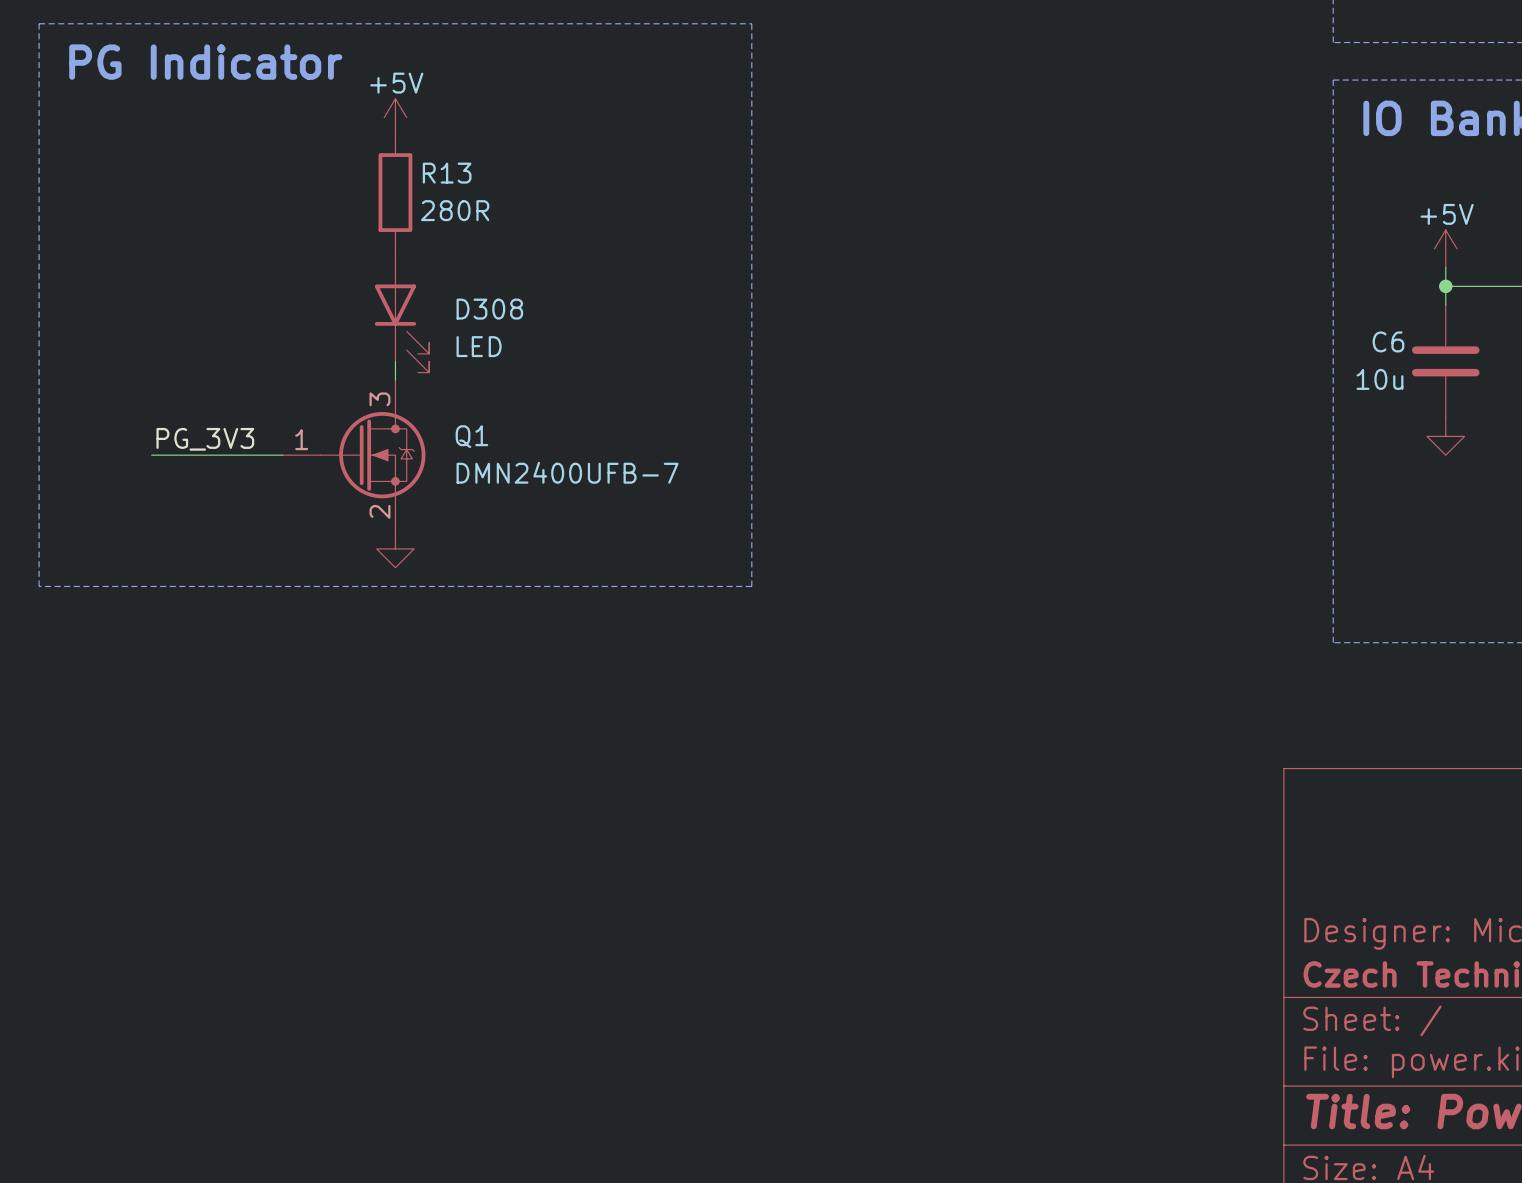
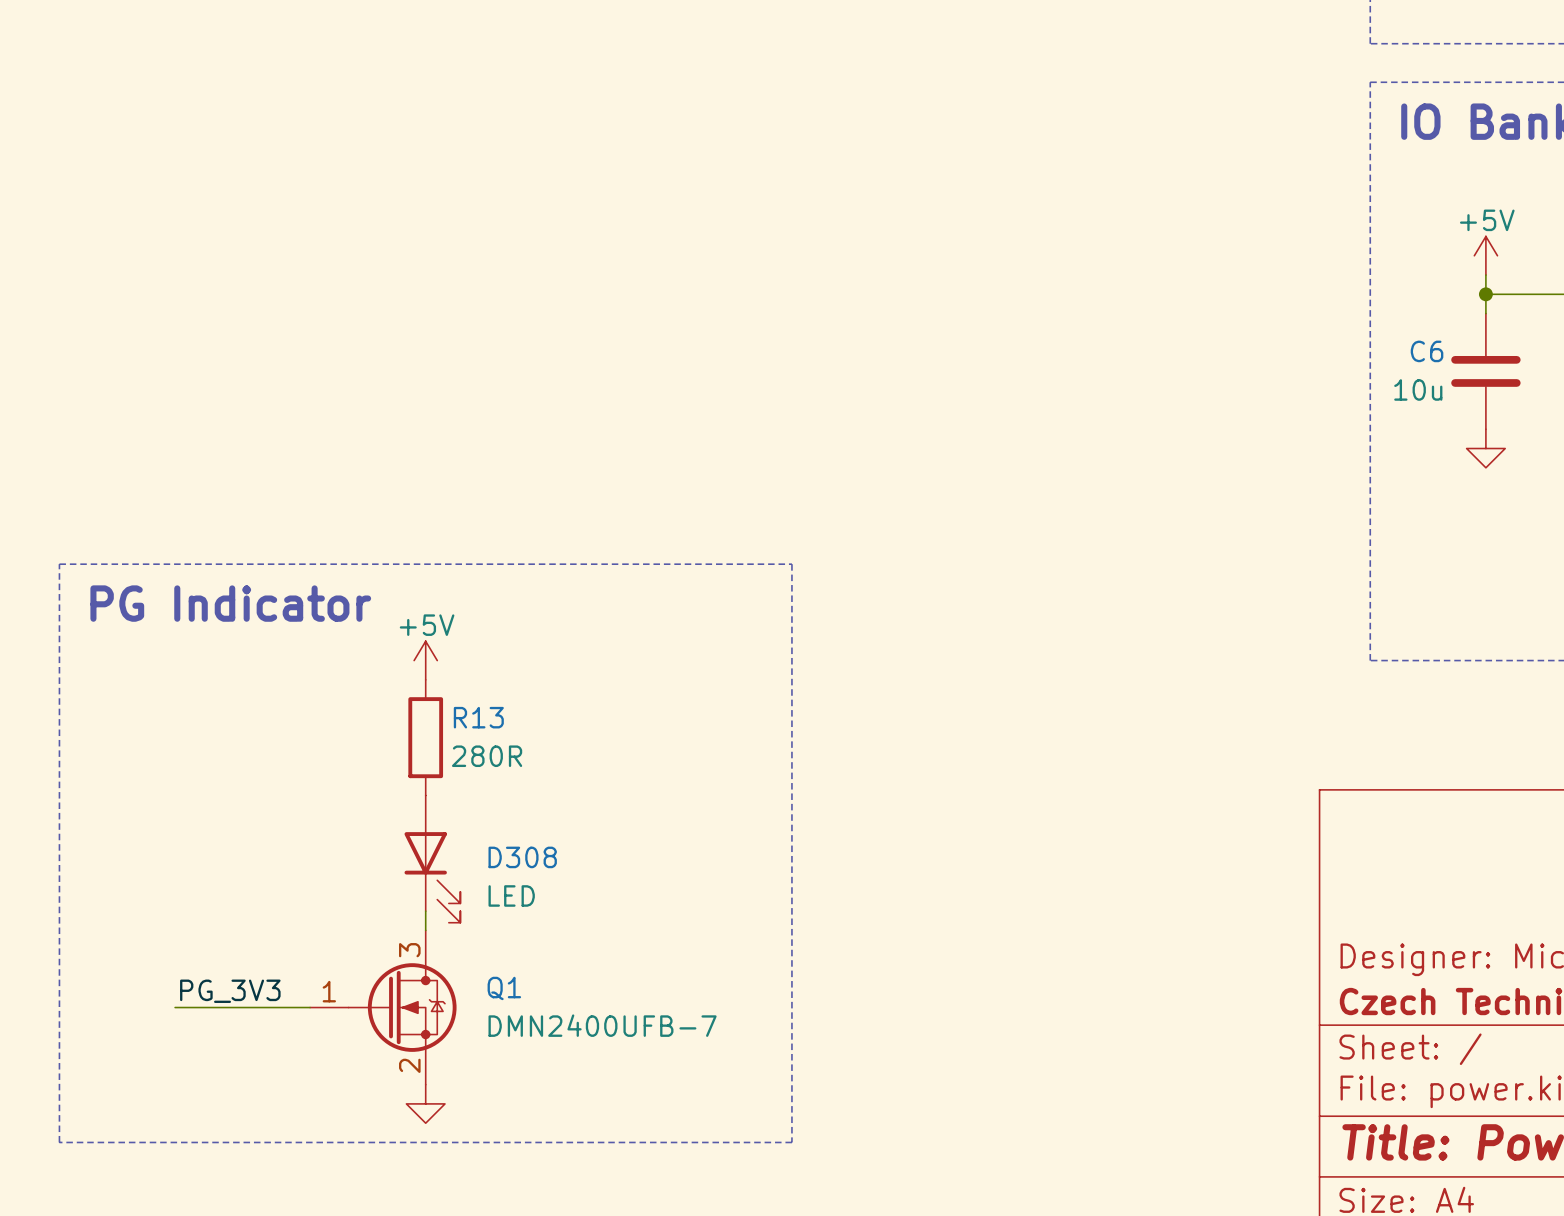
line: (39, 23) (751, 23) (751, 586) (39, 586) (39, 23) -> none
text: PG Indicator (205, 62) -> none
power symbol: +5V (395, 117) -> none
R13 position: (395, 192) -> (425, 737)
D308 position: (402, 310) -> (432, 859)
wire: (395, 361) (395, 380) -> none
label: PG_3V3 (205, 439) -> none
wire: (151, 455) (282, 455) -> none
Q1 position: (354, 455) -> (383, 1007)
line: none -> (59, 564) (791, 564) (791, 1142) (59, 1142) (59, 564)
power symbol: (395, 548) -> none
text: none -> PG Indicator (230, 603)
power symbol: none -> +5V (425, 660)
wire: none -> (425, 911) (425, 930)
label: none -> PG_3V3 (230, 991)
wire: none -> (175, 1007) (310, 1007)
power symbol: none -> (425, 1103)

